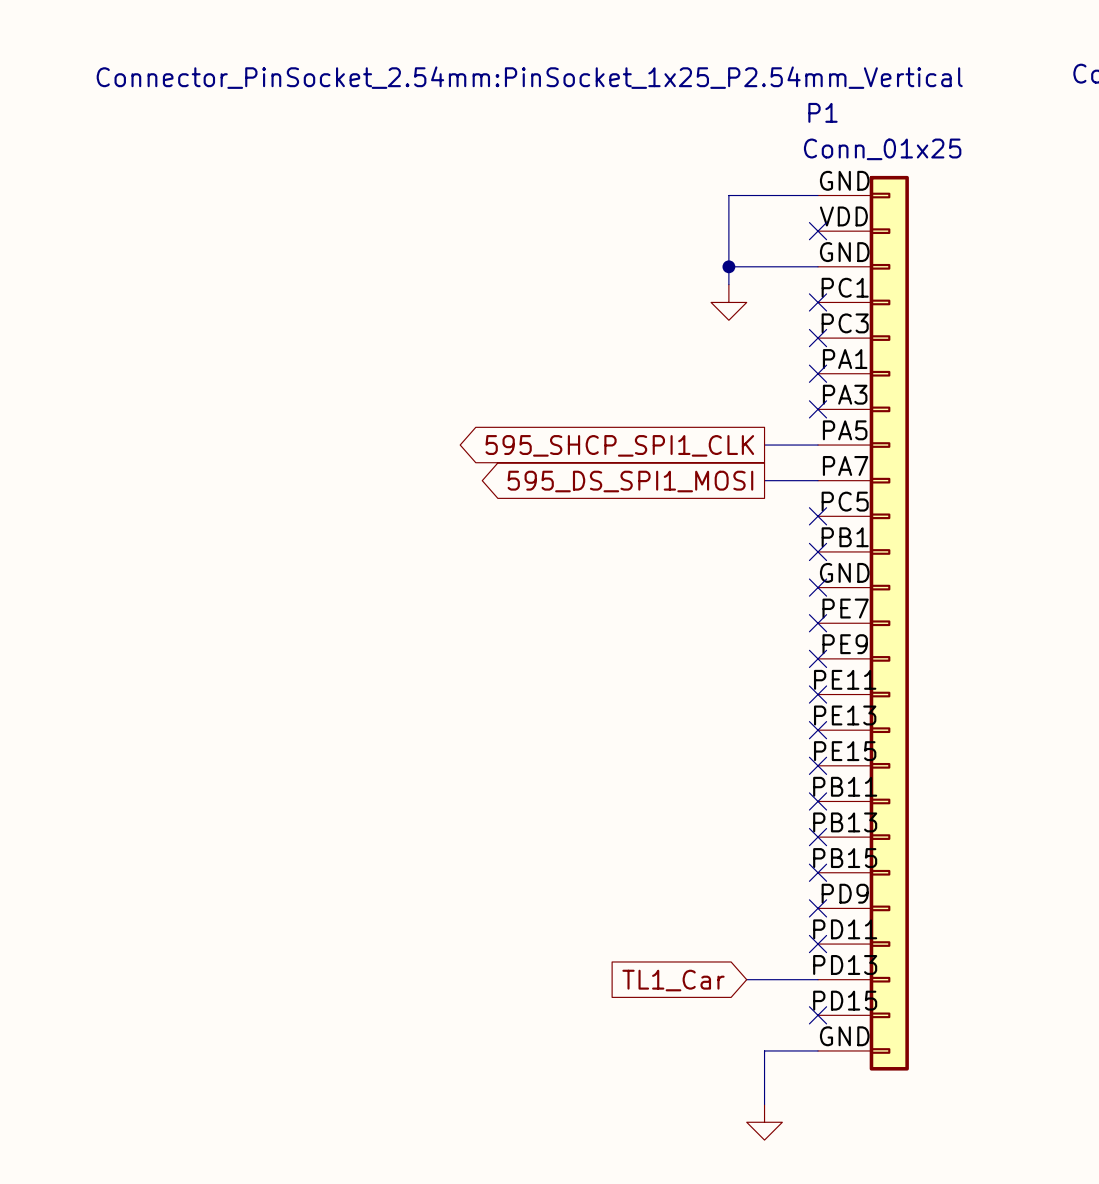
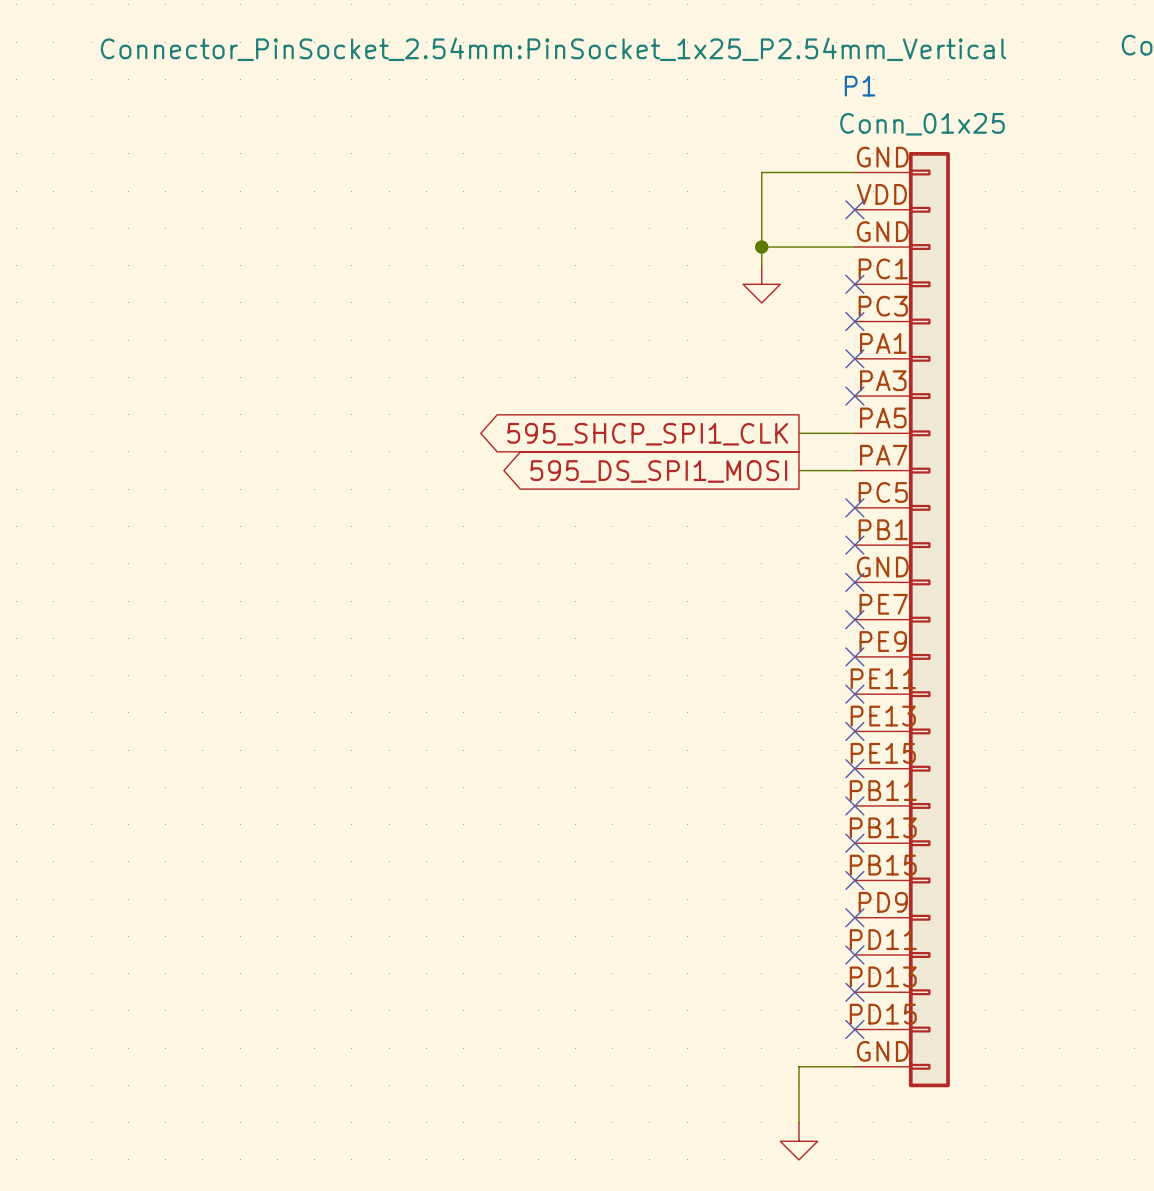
wire: (746, 979) (818, 979) -> none
no-connect mark: none -> (854, 992)
global label: TL1_Car (673, 980) -> none

